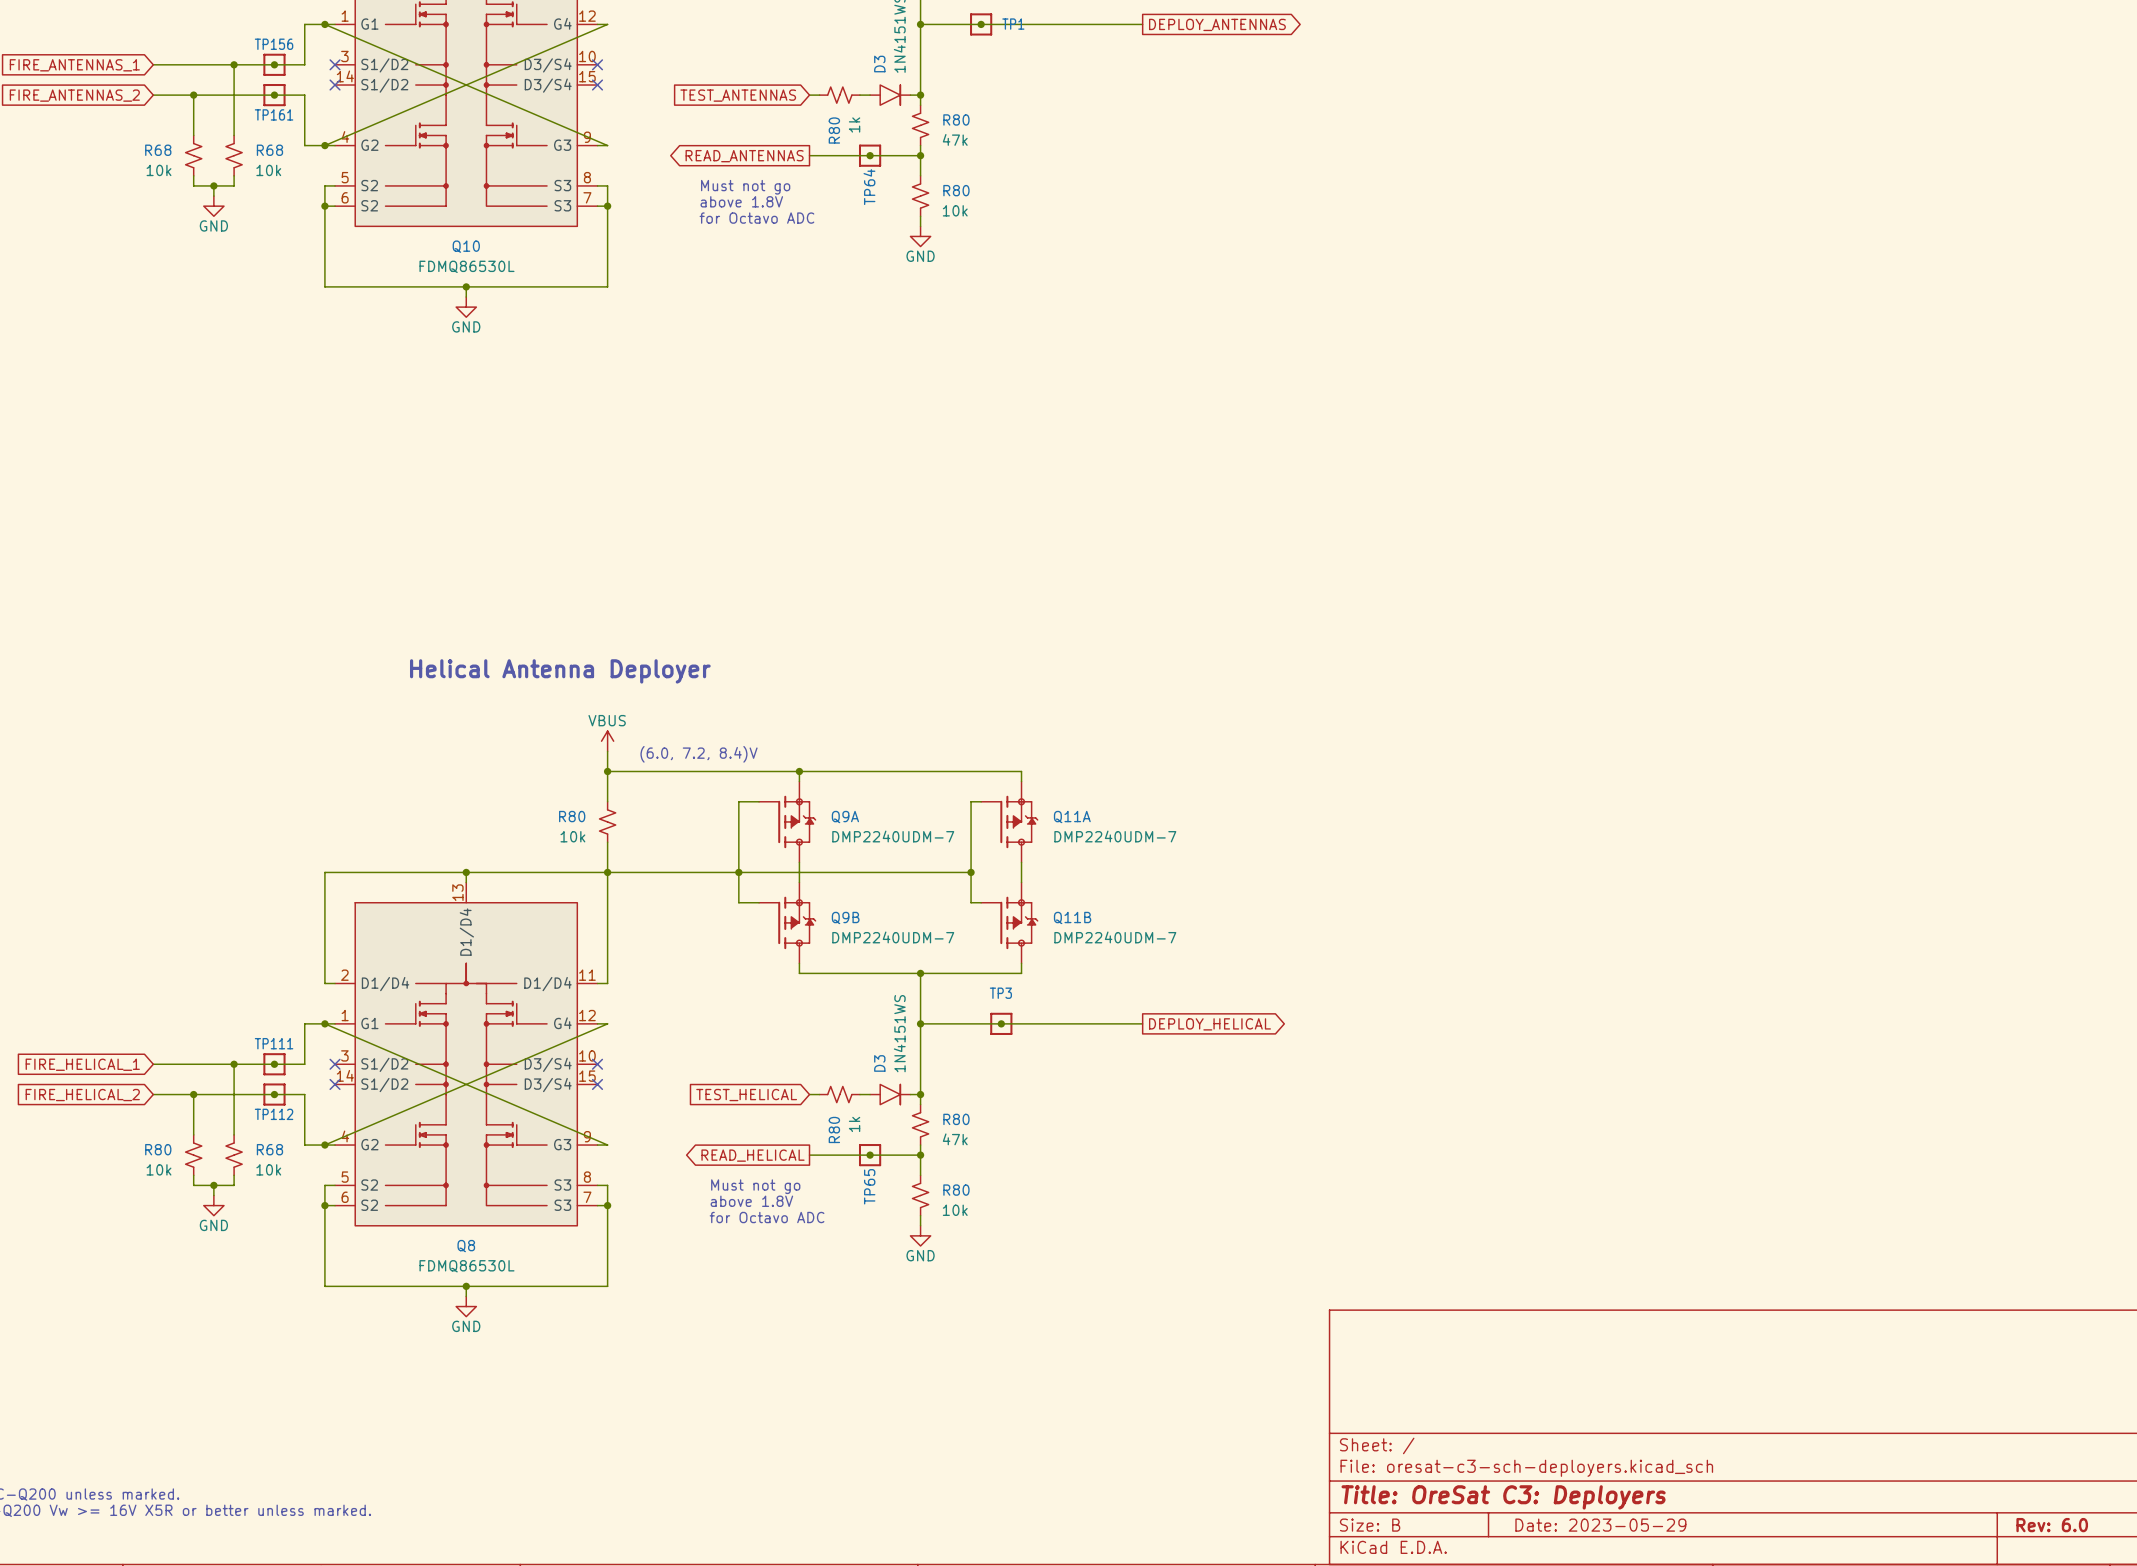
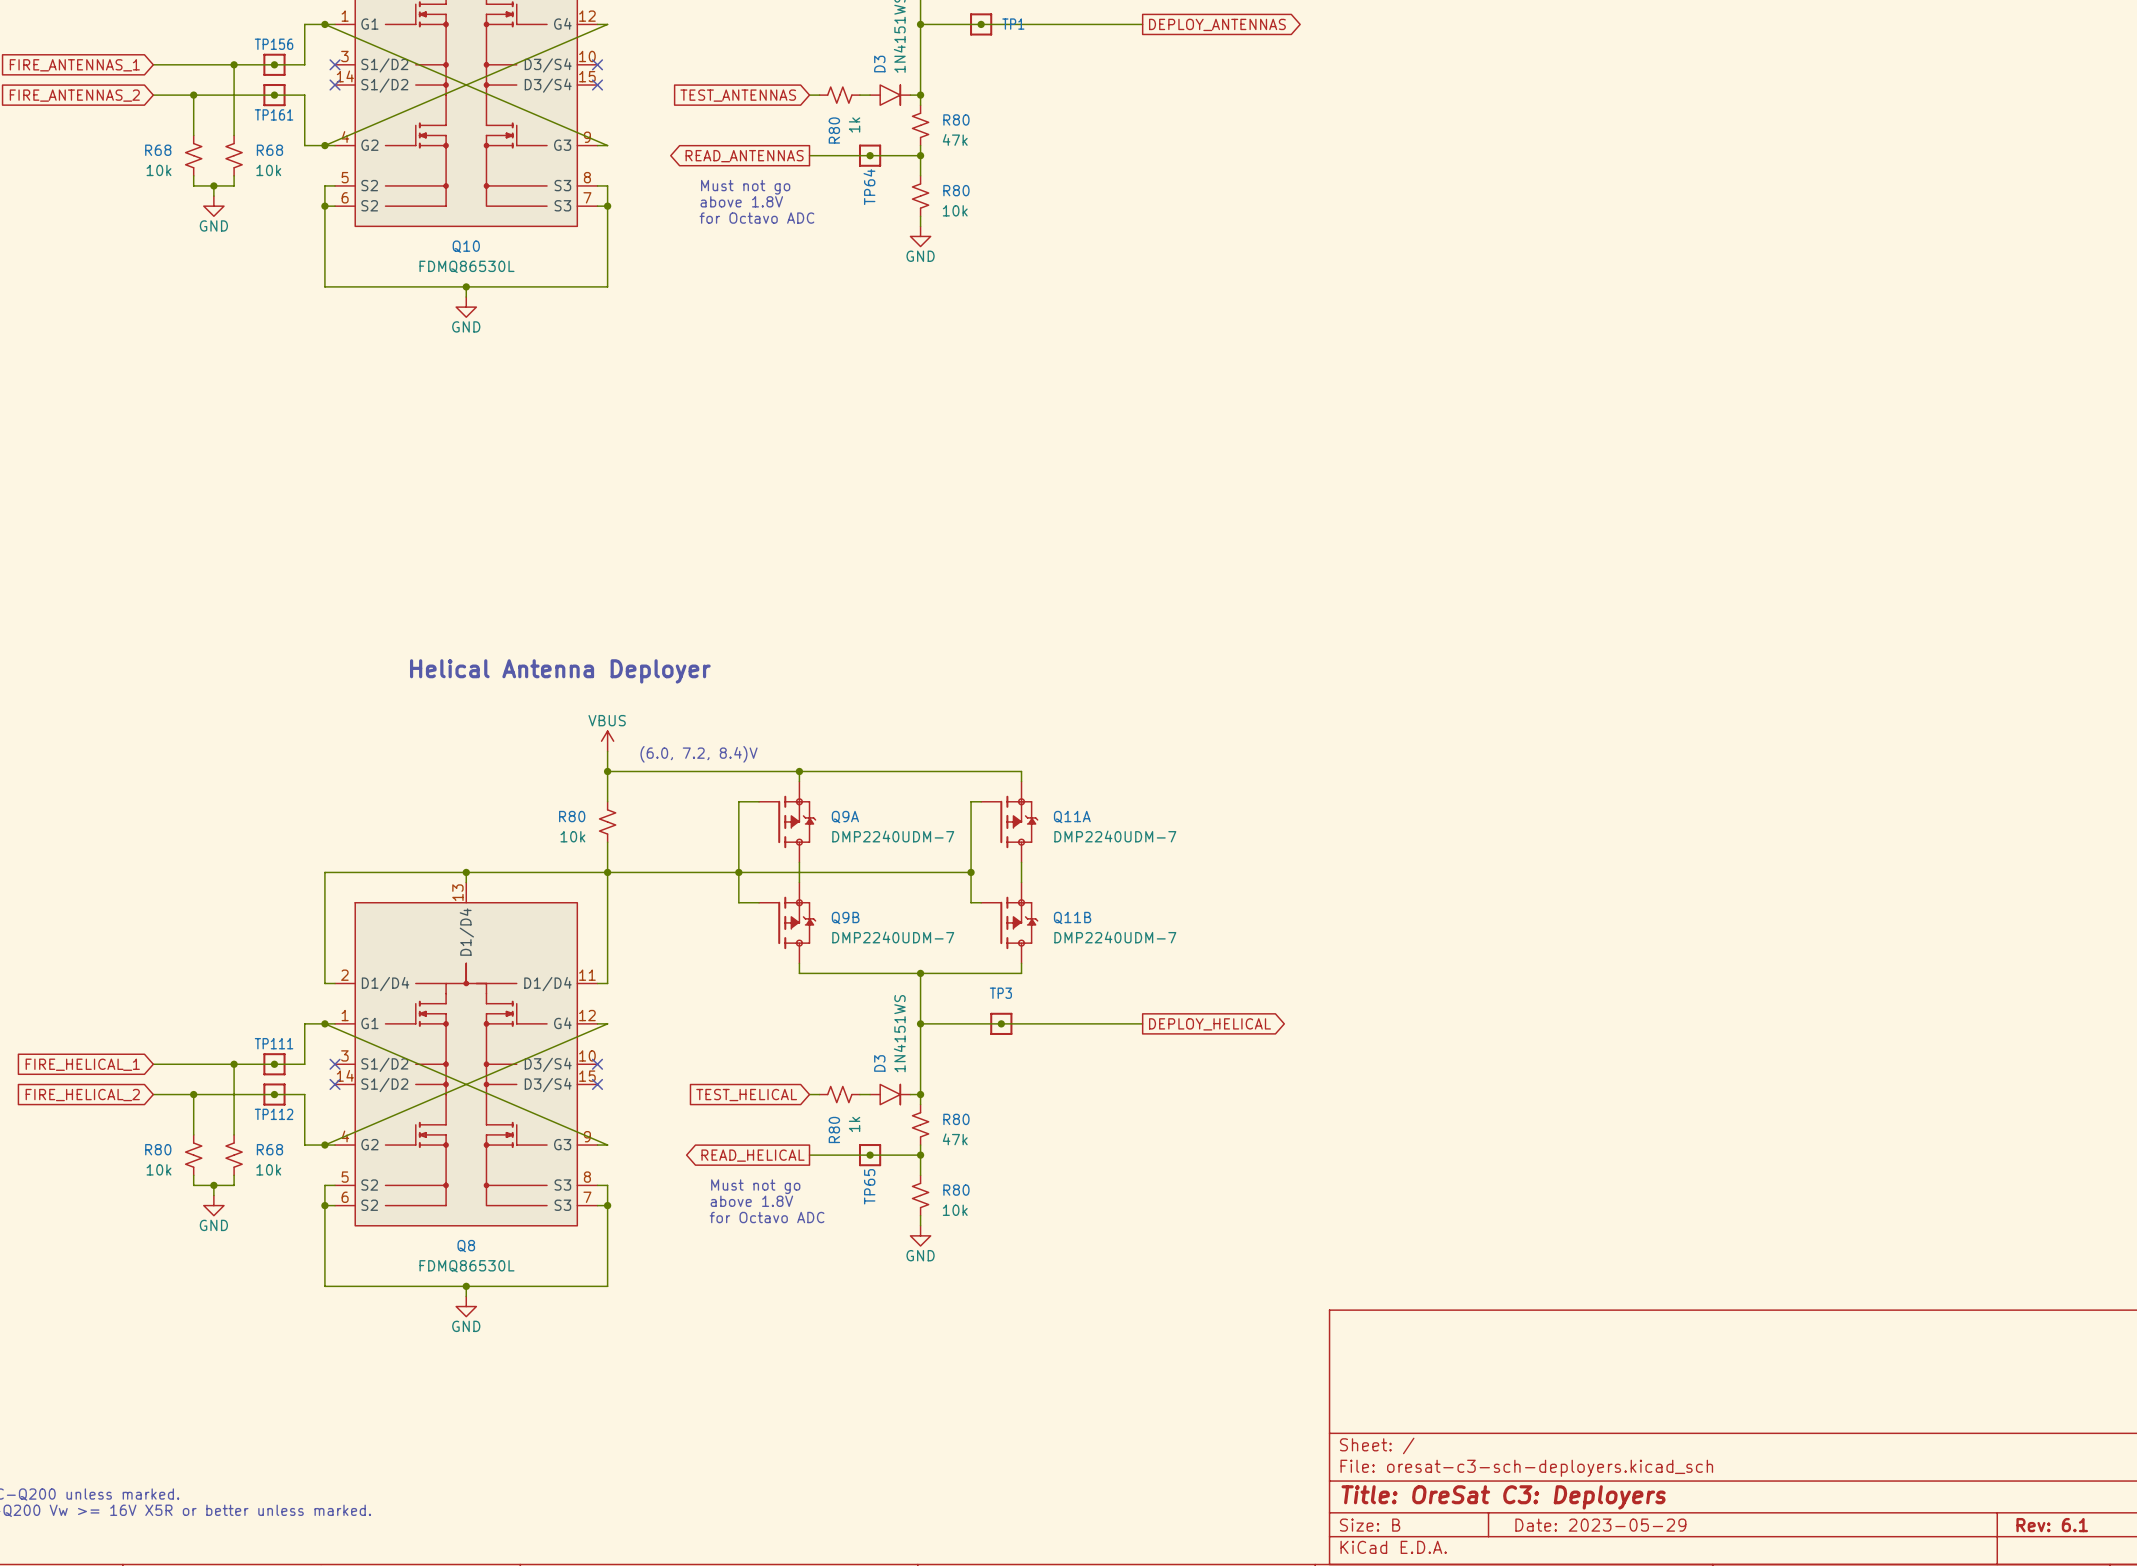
title block: Rev: 6.0 (2052, 1525) -> Rev: 6.1 (2052, 1525)

